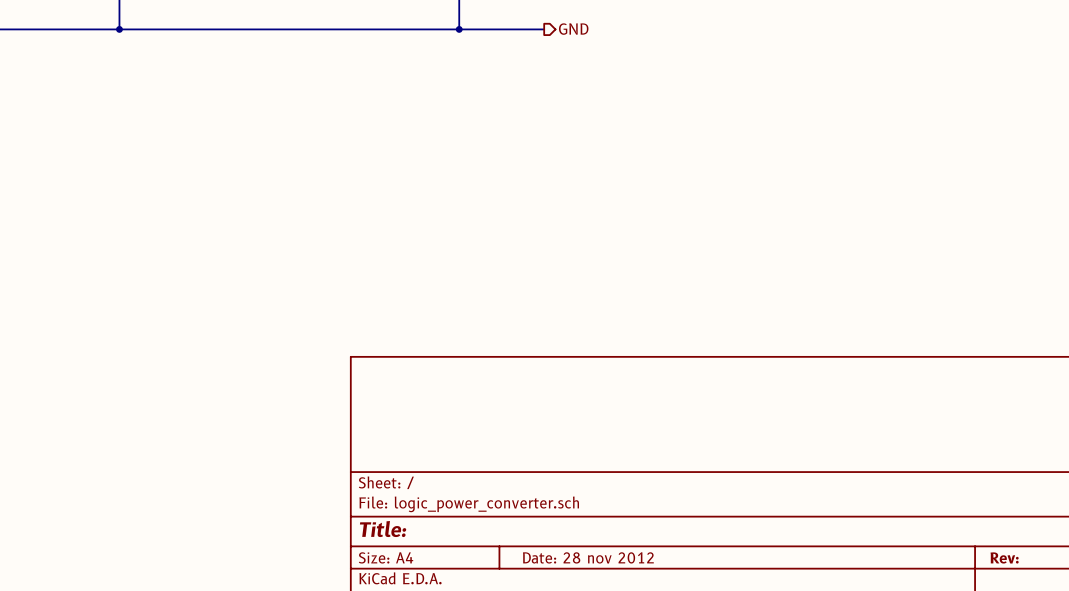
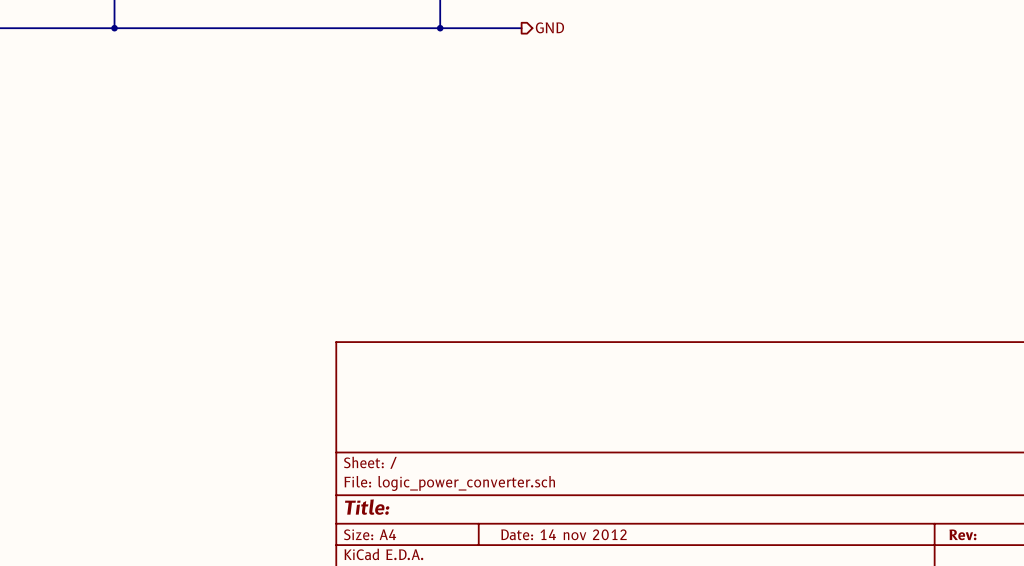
title block: Date: 28 nov 2012 (588, 557) -> Date: 14 nov 2012 (563, 534)

